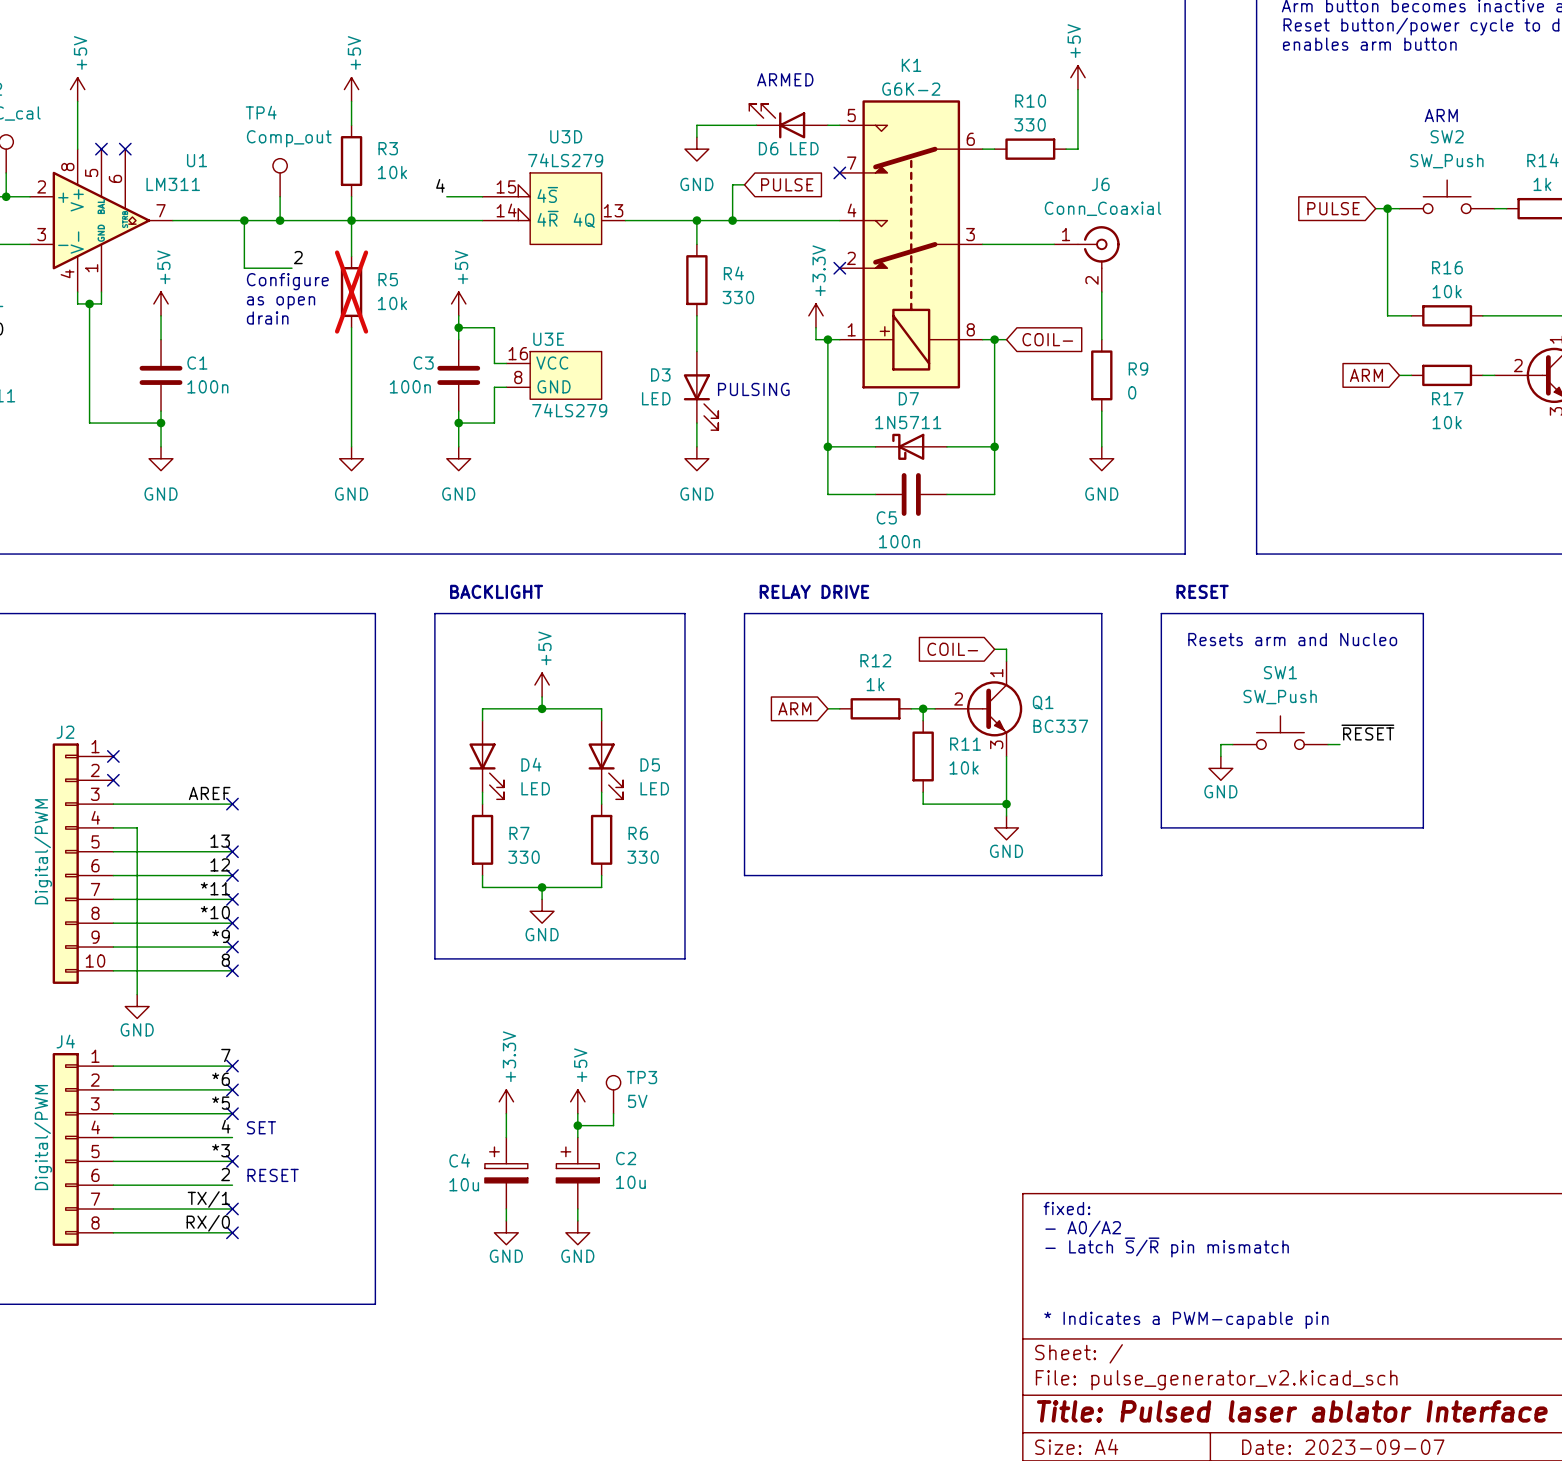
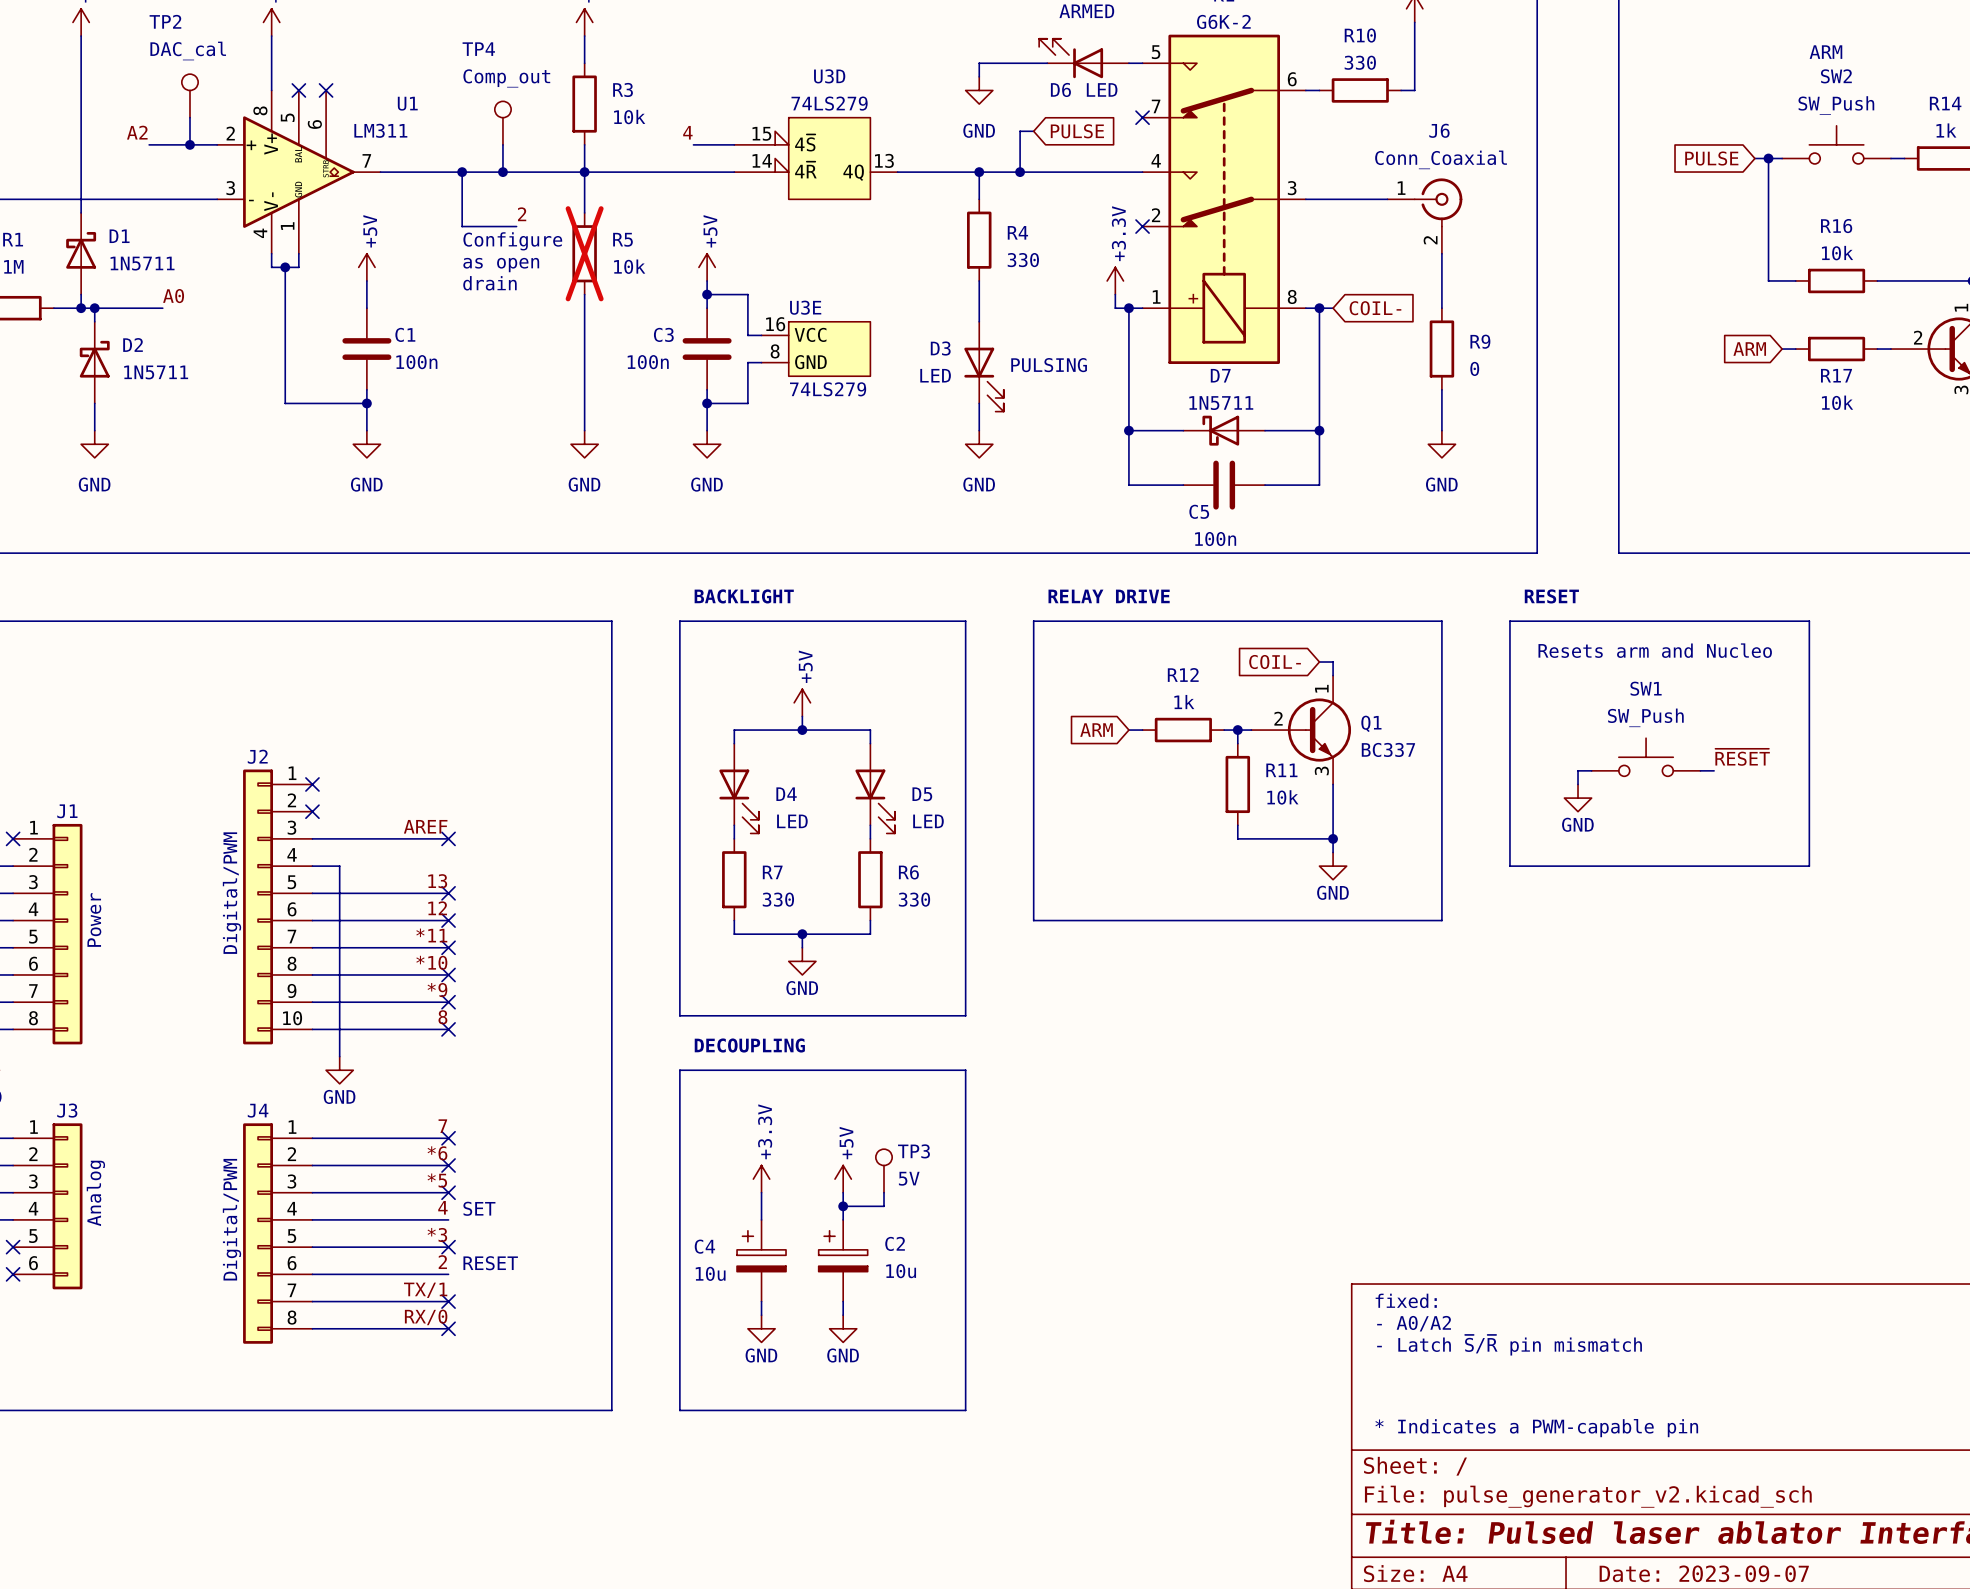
text: none -> DECOUPLING (749, 1045)
line: none -> (679, 1070) (965, 1070) (965, 1410) (679, 1410) (679, 1070)

